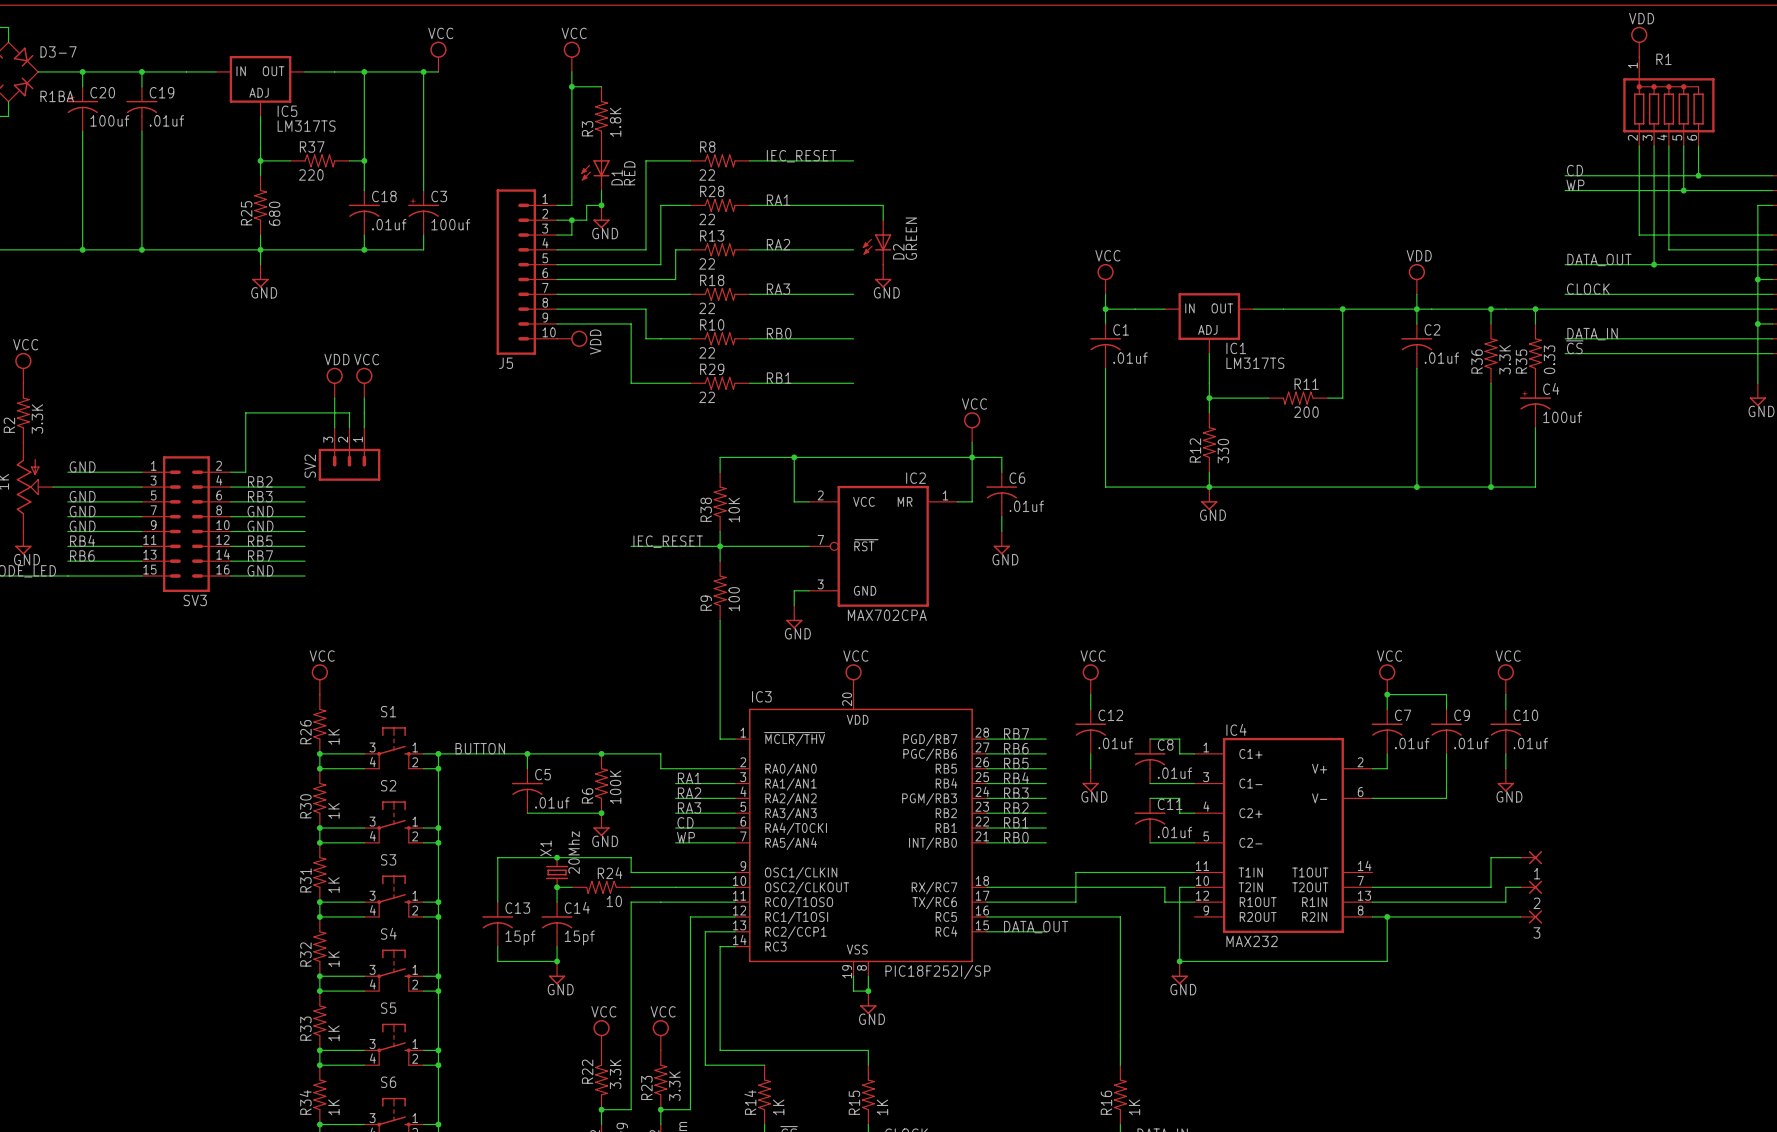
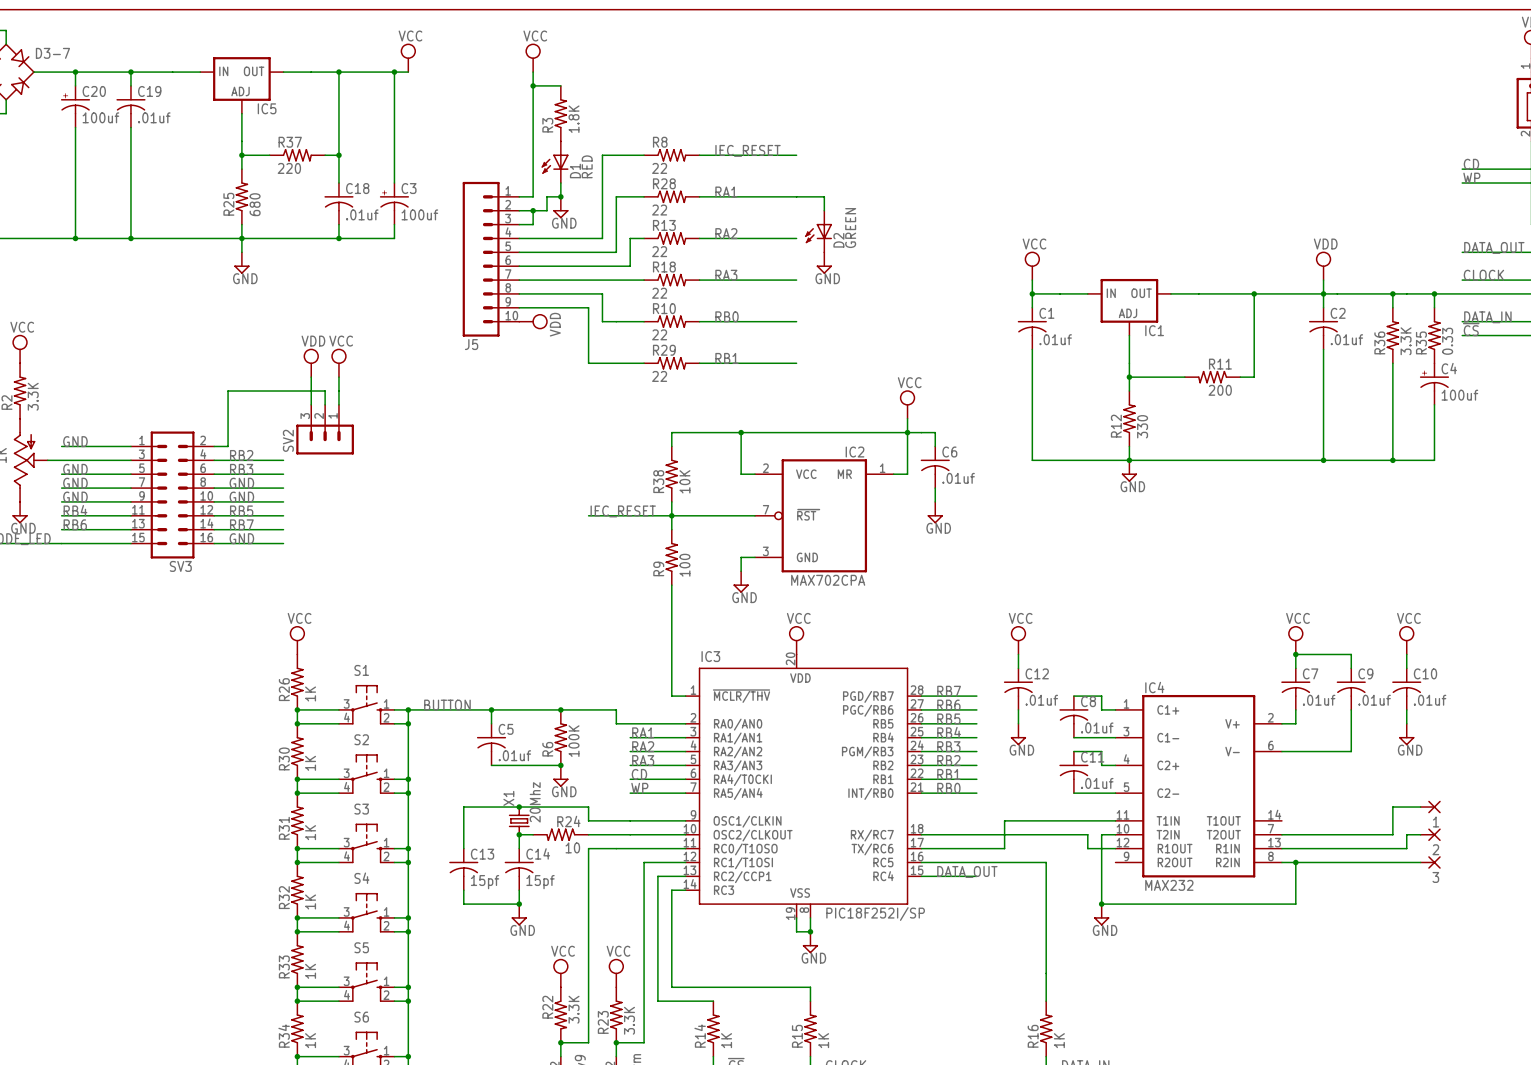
D3-7 value: R1BA (57, 96) -> none
IC5 value: LM317TS (306, 126) -> none
IC1 value: LM317TS (1255, 363) -> none

